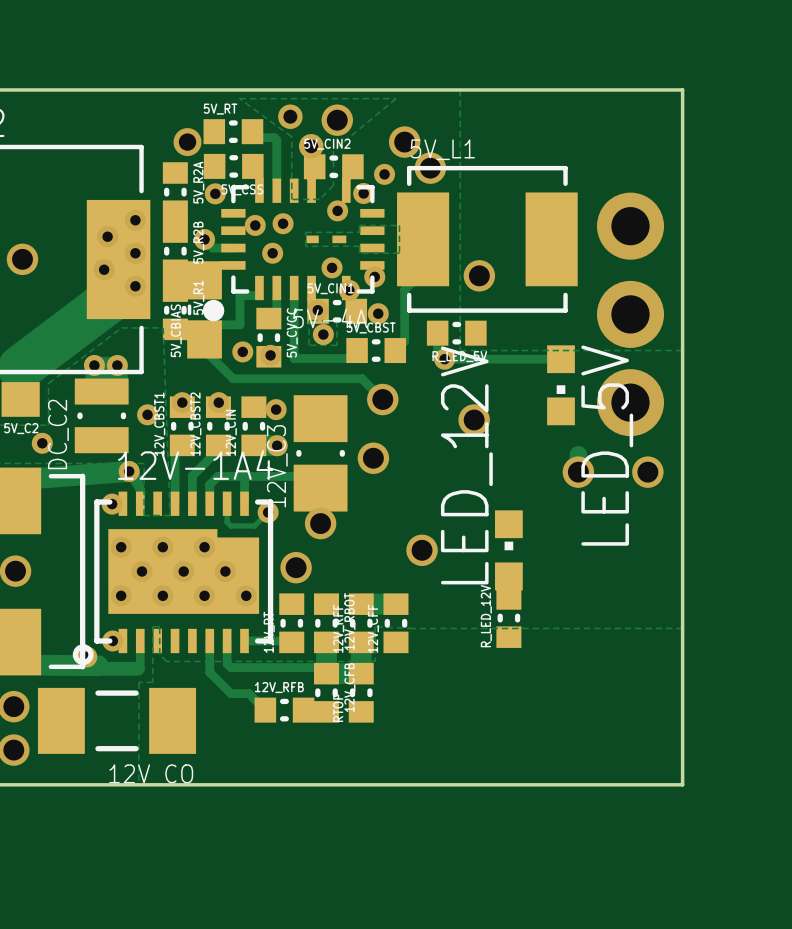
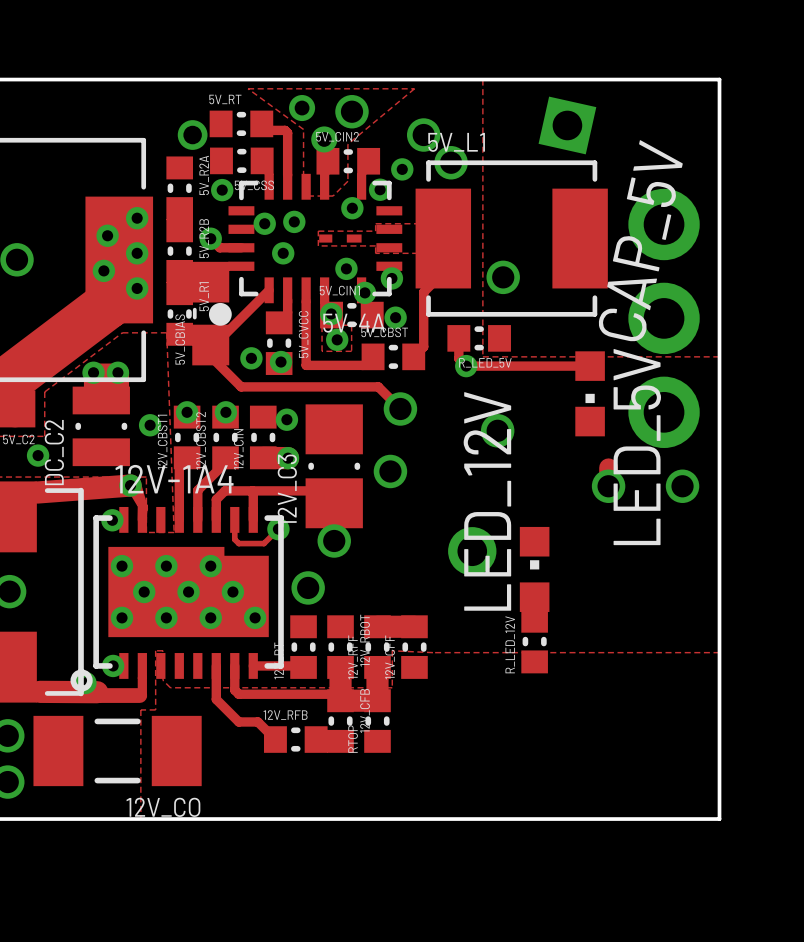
track: none -> (269, 290) (214, 345) (210, 345)
track: (254, 295) (239, 295) (239, 324) (221, 324) -> none
CAP_5V: none -> (522, 336)
via: (422, 550) -> none

